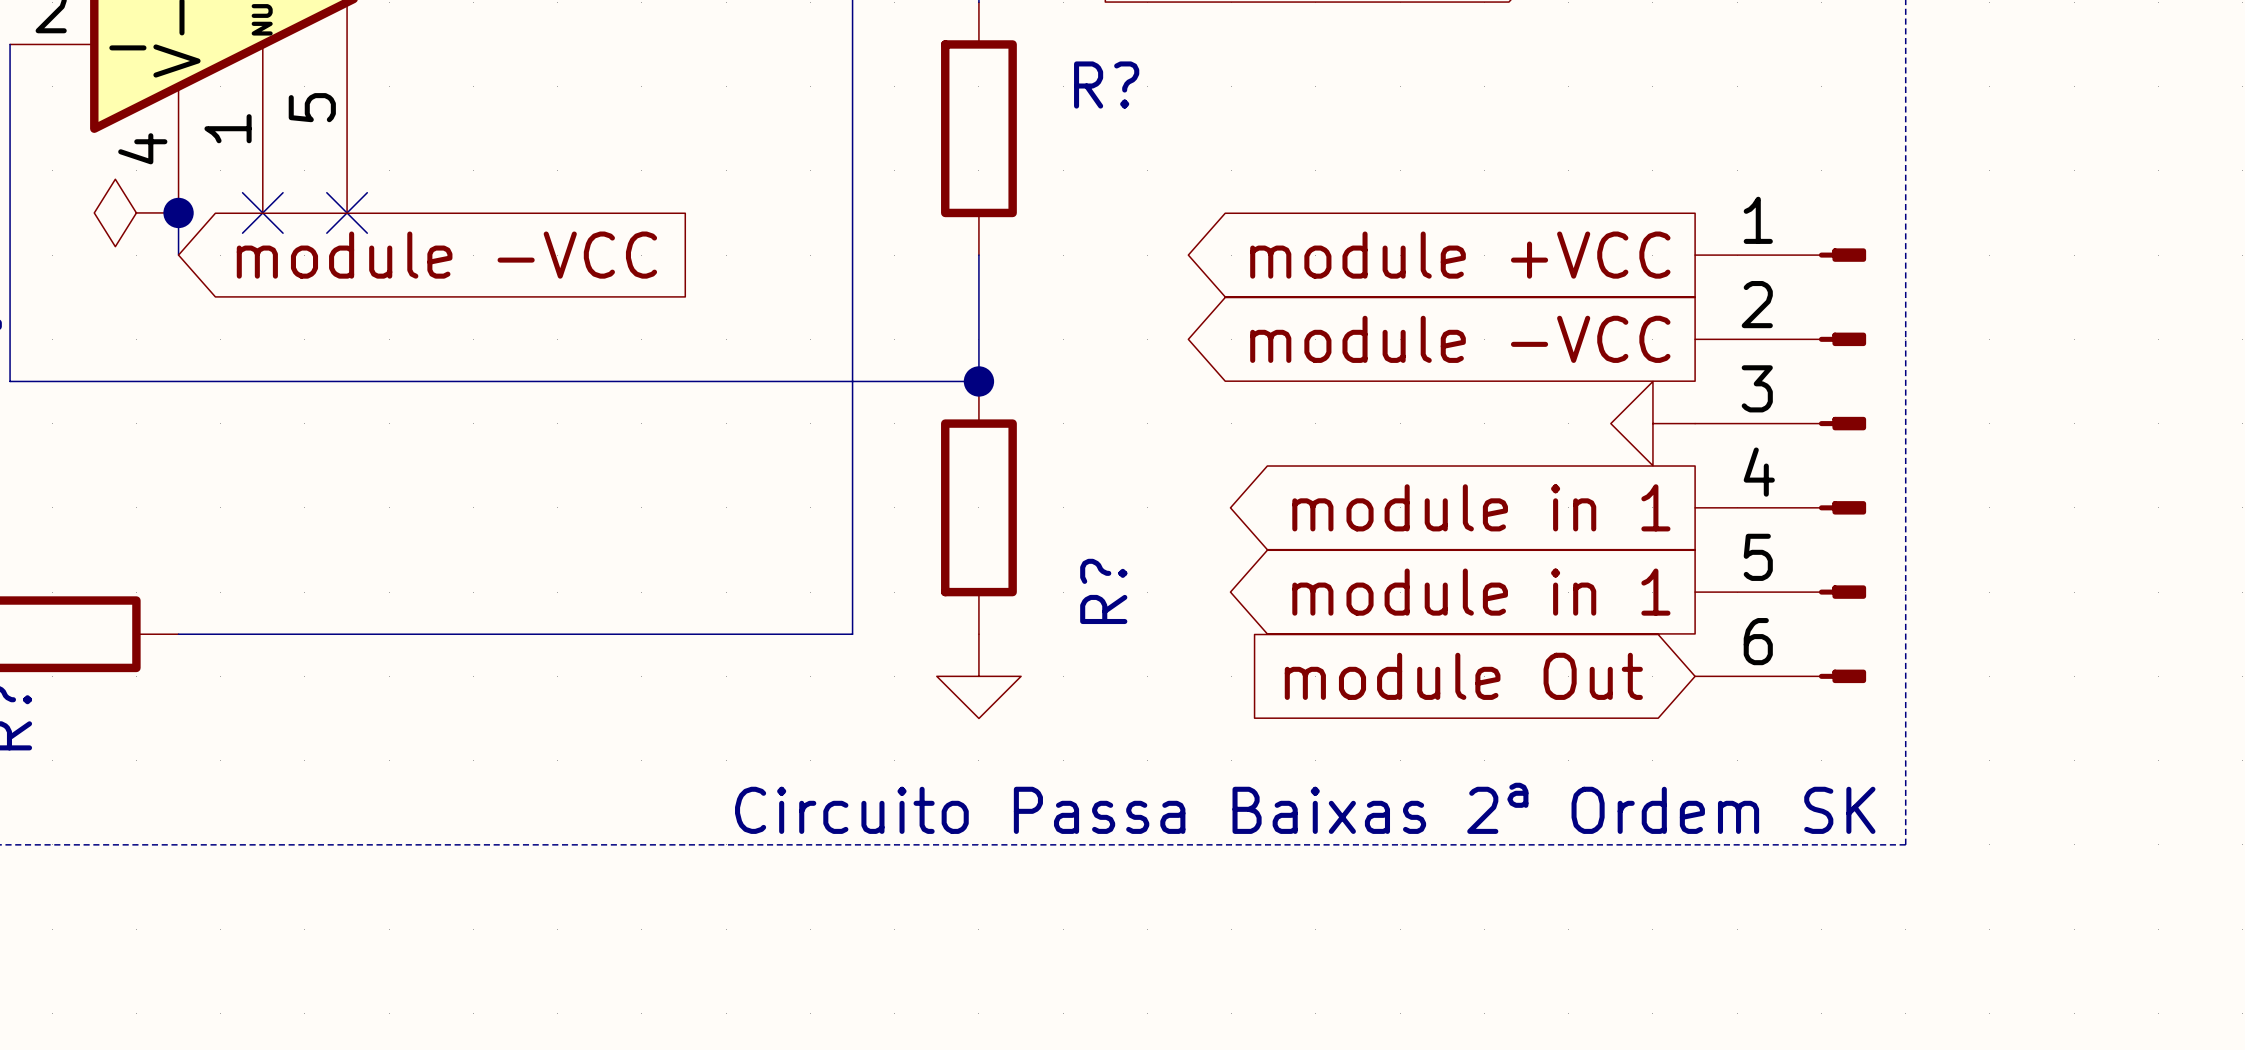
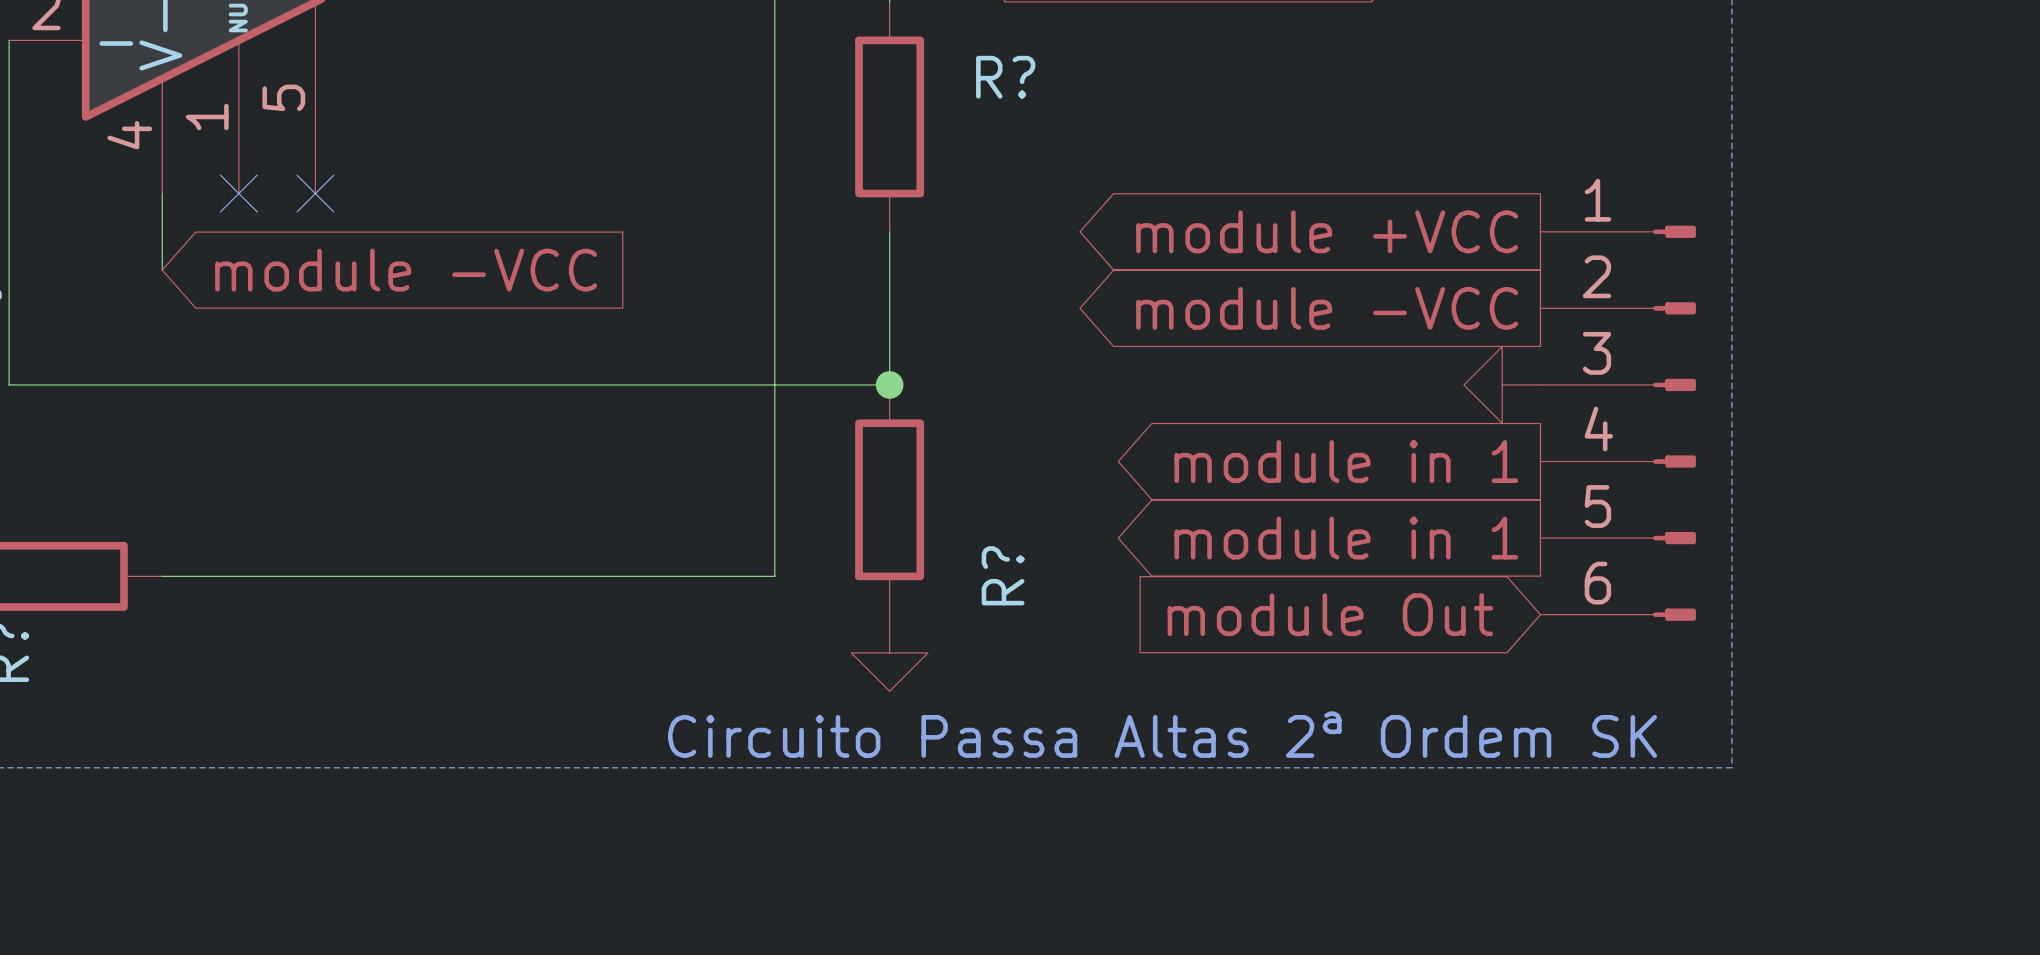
power symbol: (136, 212) -> none
junction: (178, 212) -> none
wire: none -> (162, 231) (162, 270)
global label position: module -VCC (446, 255) -> module -VCC (406, 270)
wire: (10, 381) (978, 381) -> (9, 346) (9, 384) (889, 384) (889, 346)
junction position: (978, 381) -> (889, 384)
R? position: (978, 507) -> (889, 499)
power symbol position: (978, 676) -> (889, 652)
text: Circuito Passa Baixas 2ª Ordem SK (1305, 808) -> Circuito Passa Altas 2ª Ordem SK (1162, 734)

